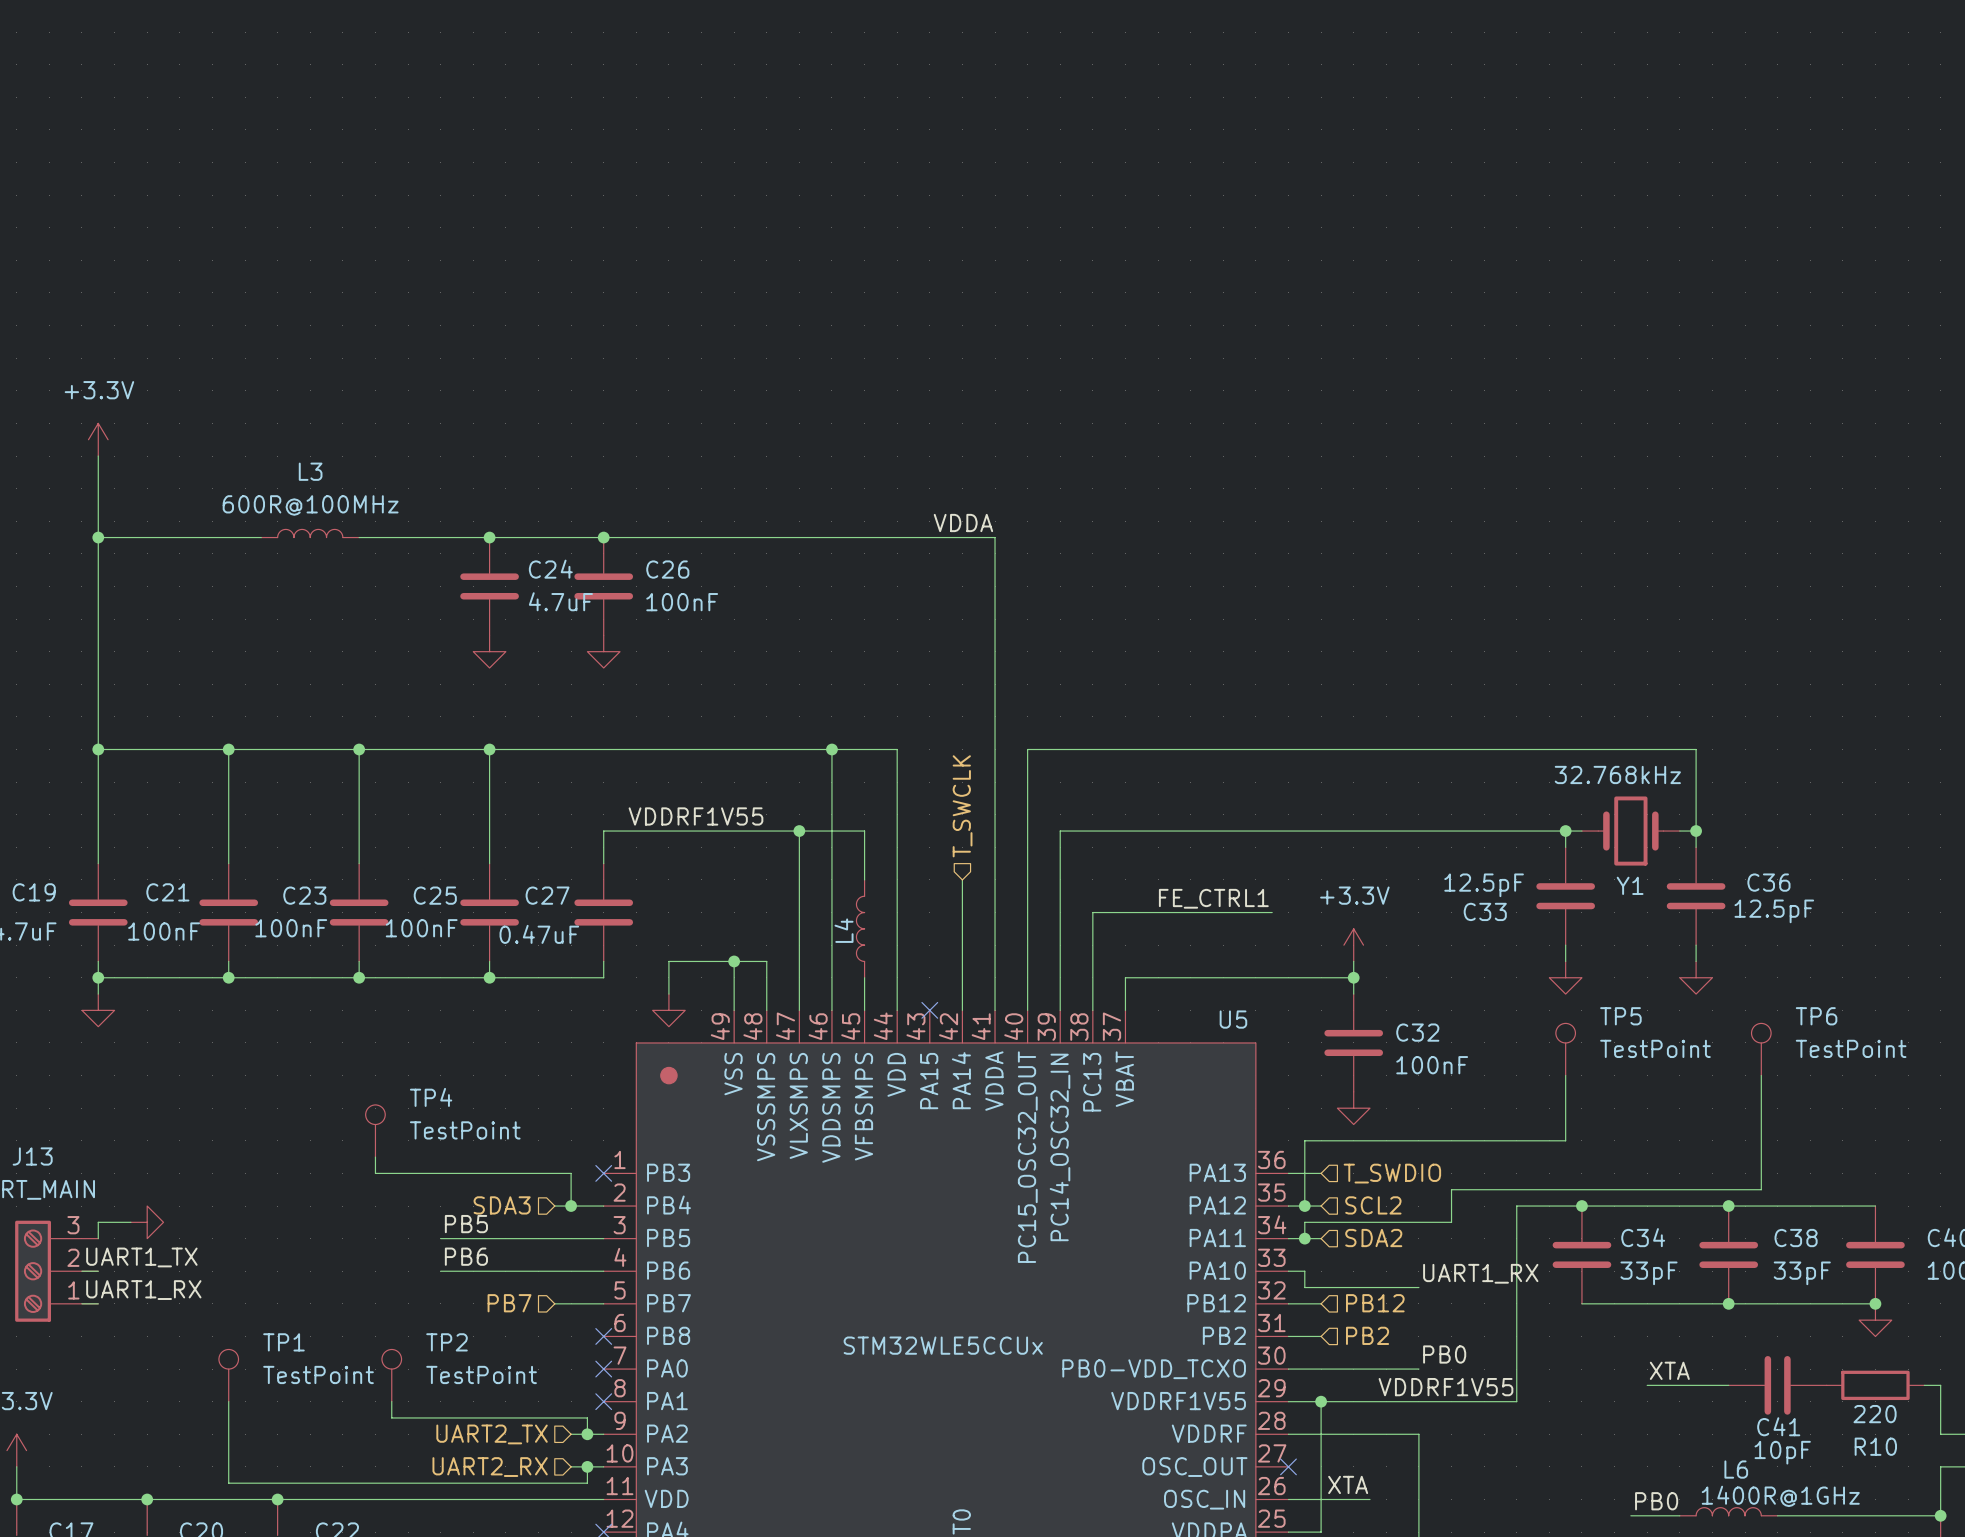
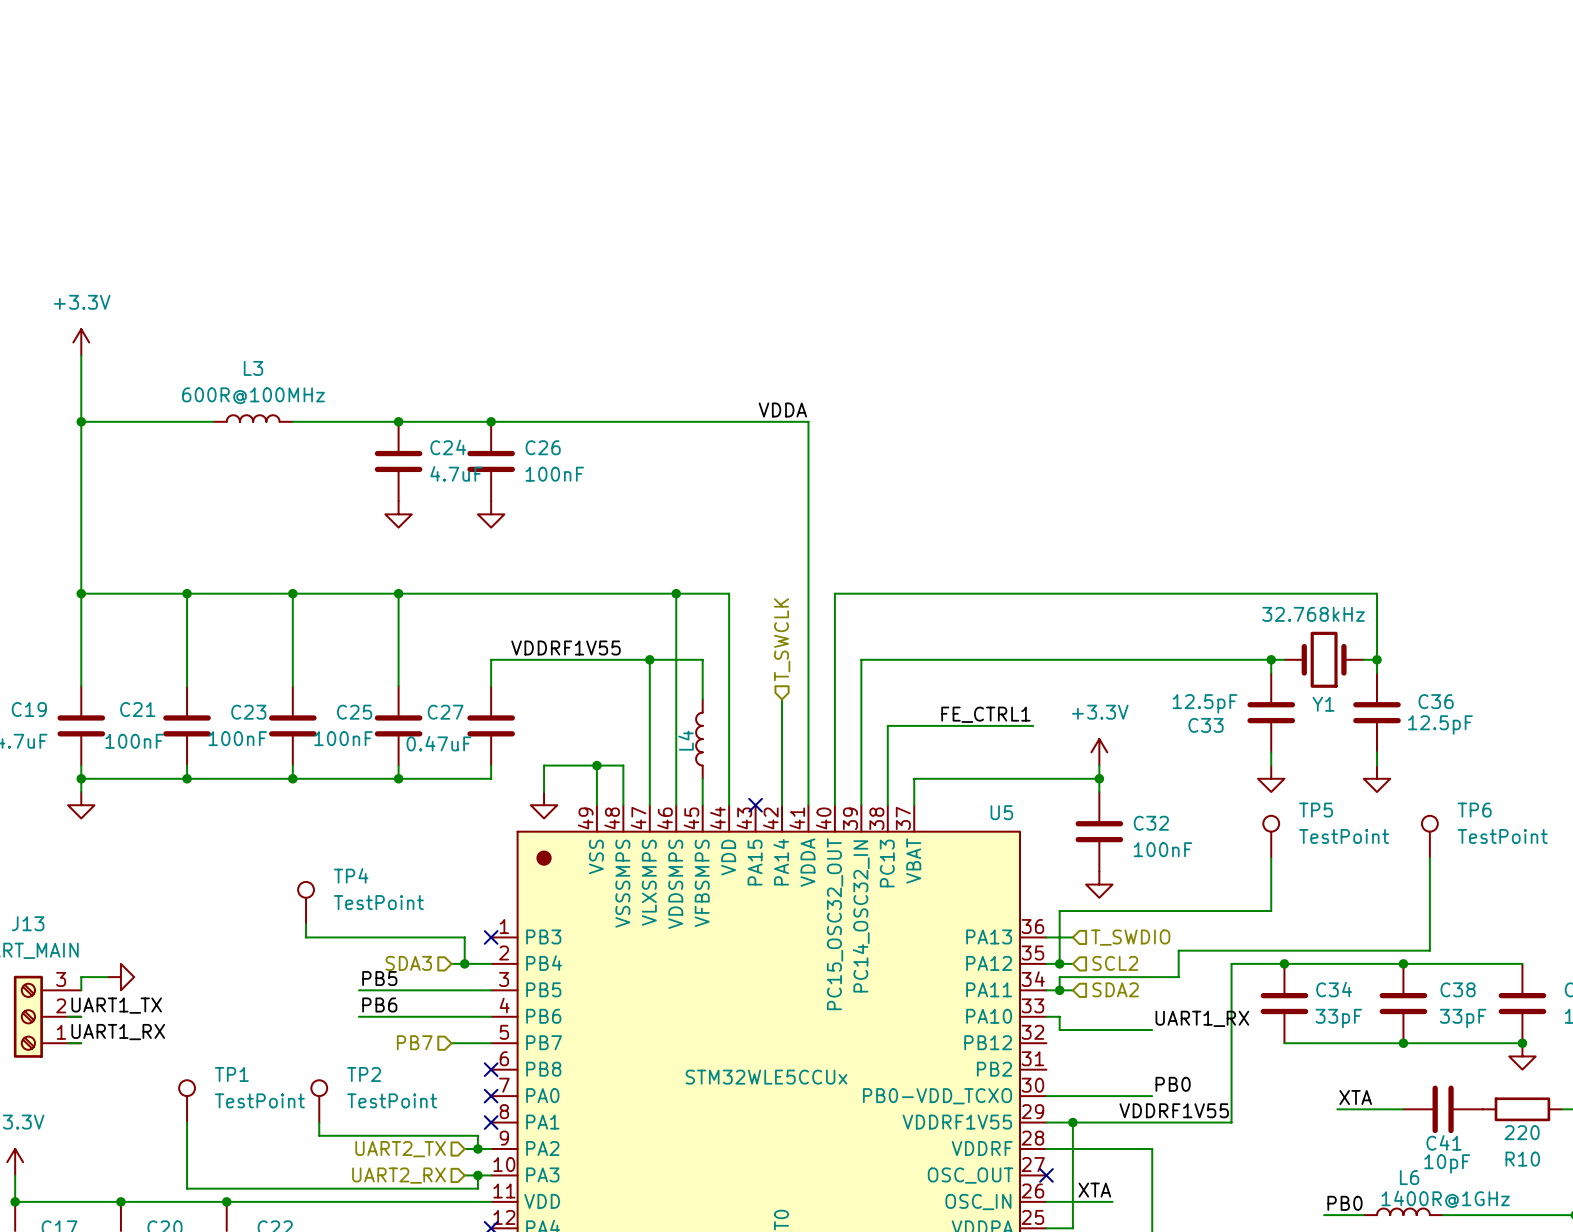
wire: (1288, 1303) (1321, 1303) -> none
hierarchical label: PB12 (1375, 1303) -> none
hierarchical label: PB2 (1367, 1335) -> none
wire: (1288, 1336) (1321, 1336) -> none

